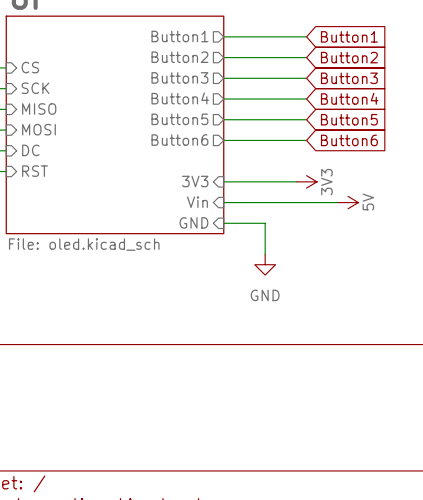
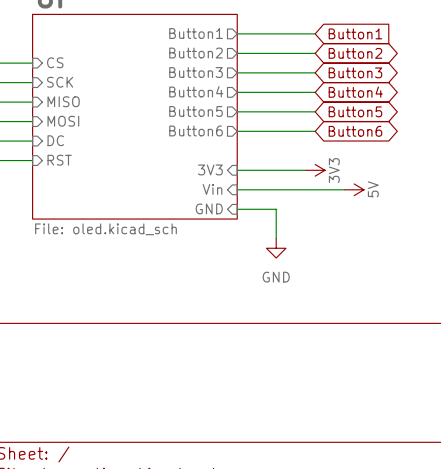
global label shape: input (349, 57) -> bidirectional (355, 53)
global label shape: input (349, 78) -> bidirectional (355, 72)
global label shape: input (349, 98) -> bidirectional (355, 92)
global label shape: input (349, 119) -> bidirectional (355, 111)
global label shape: input (349, 140) -> bidirectional (355, 131)

